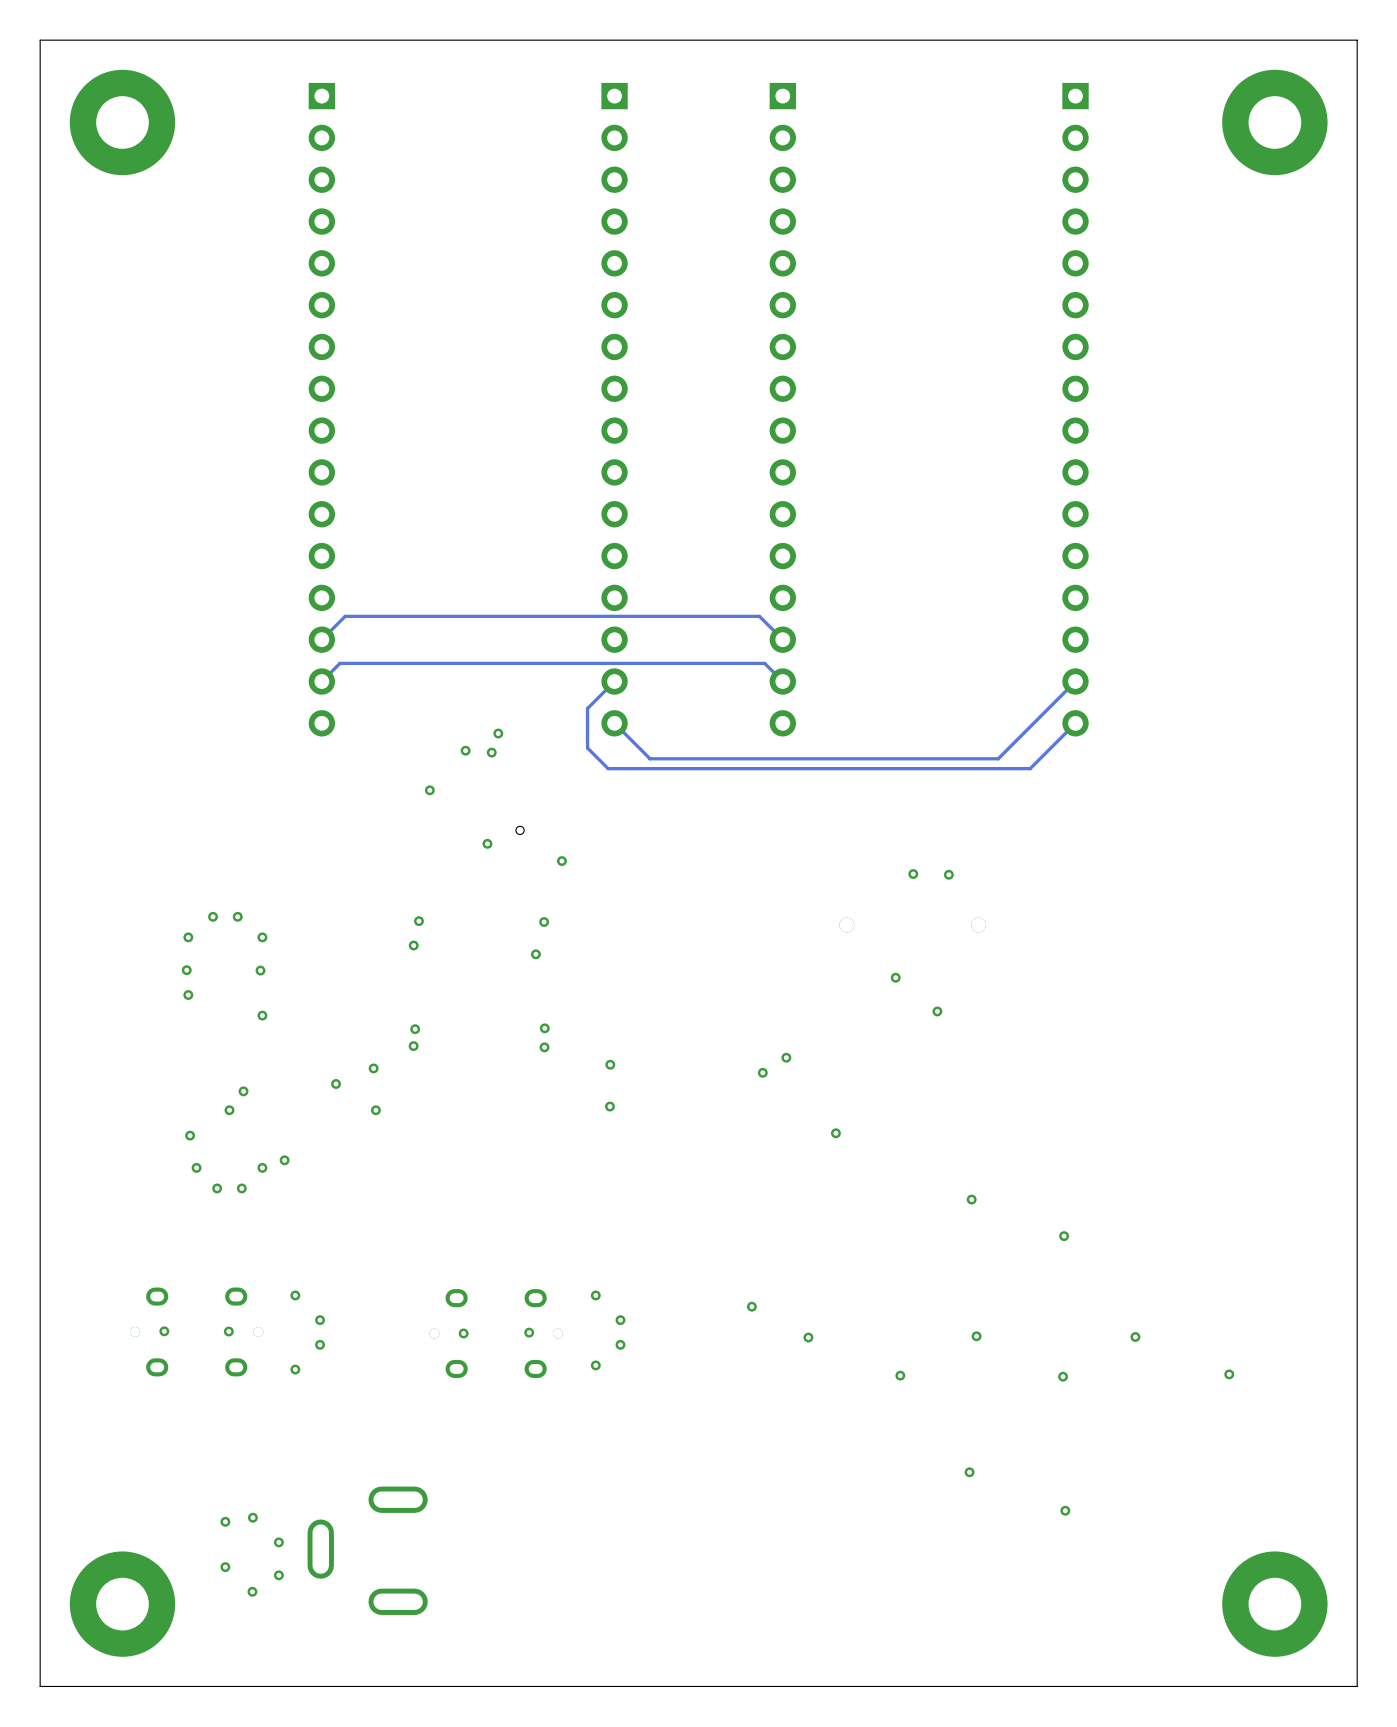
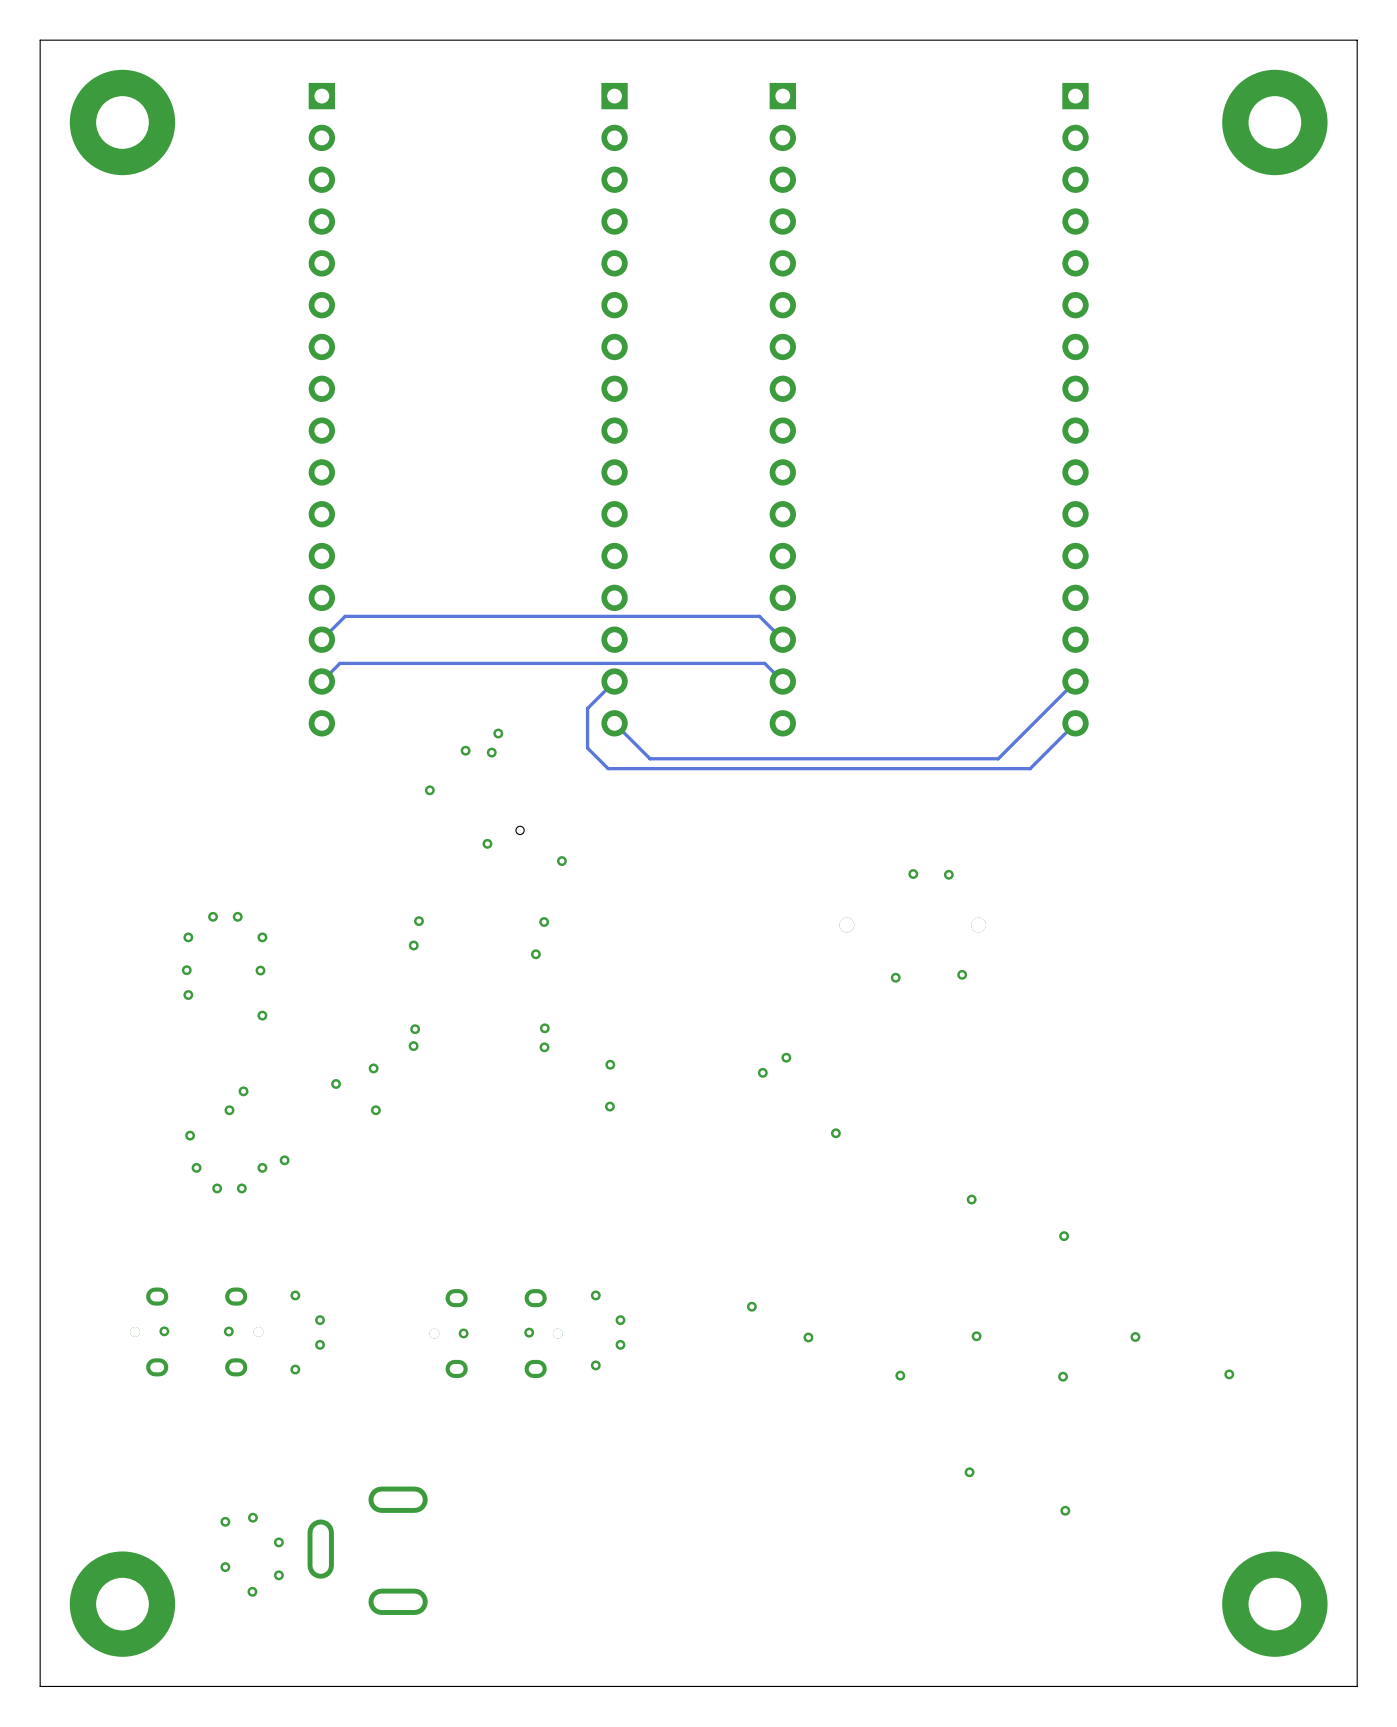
via position: (937, 1011) -> (962, 974)

